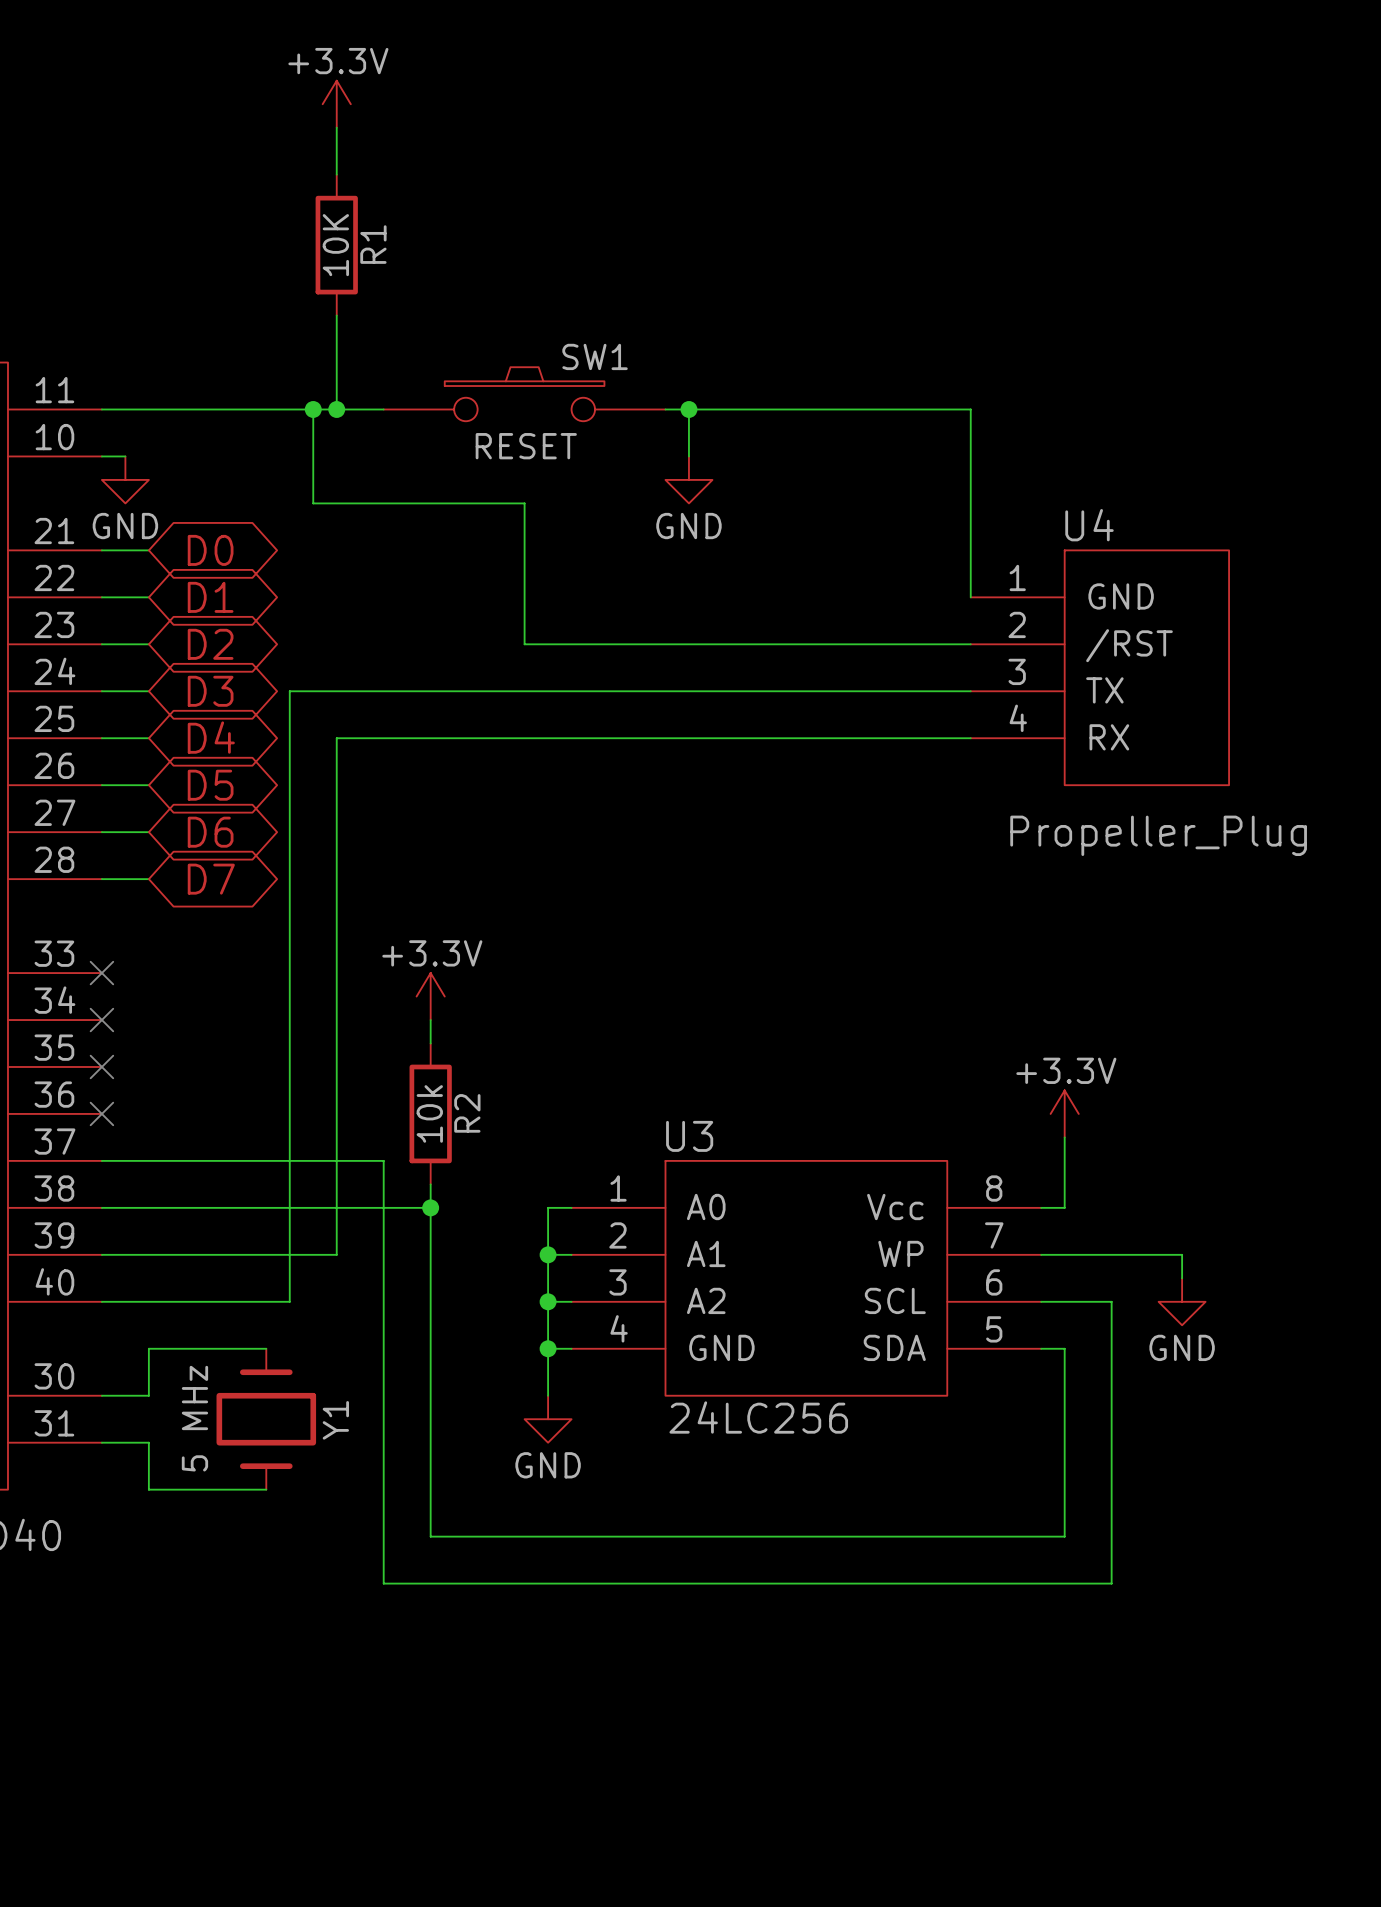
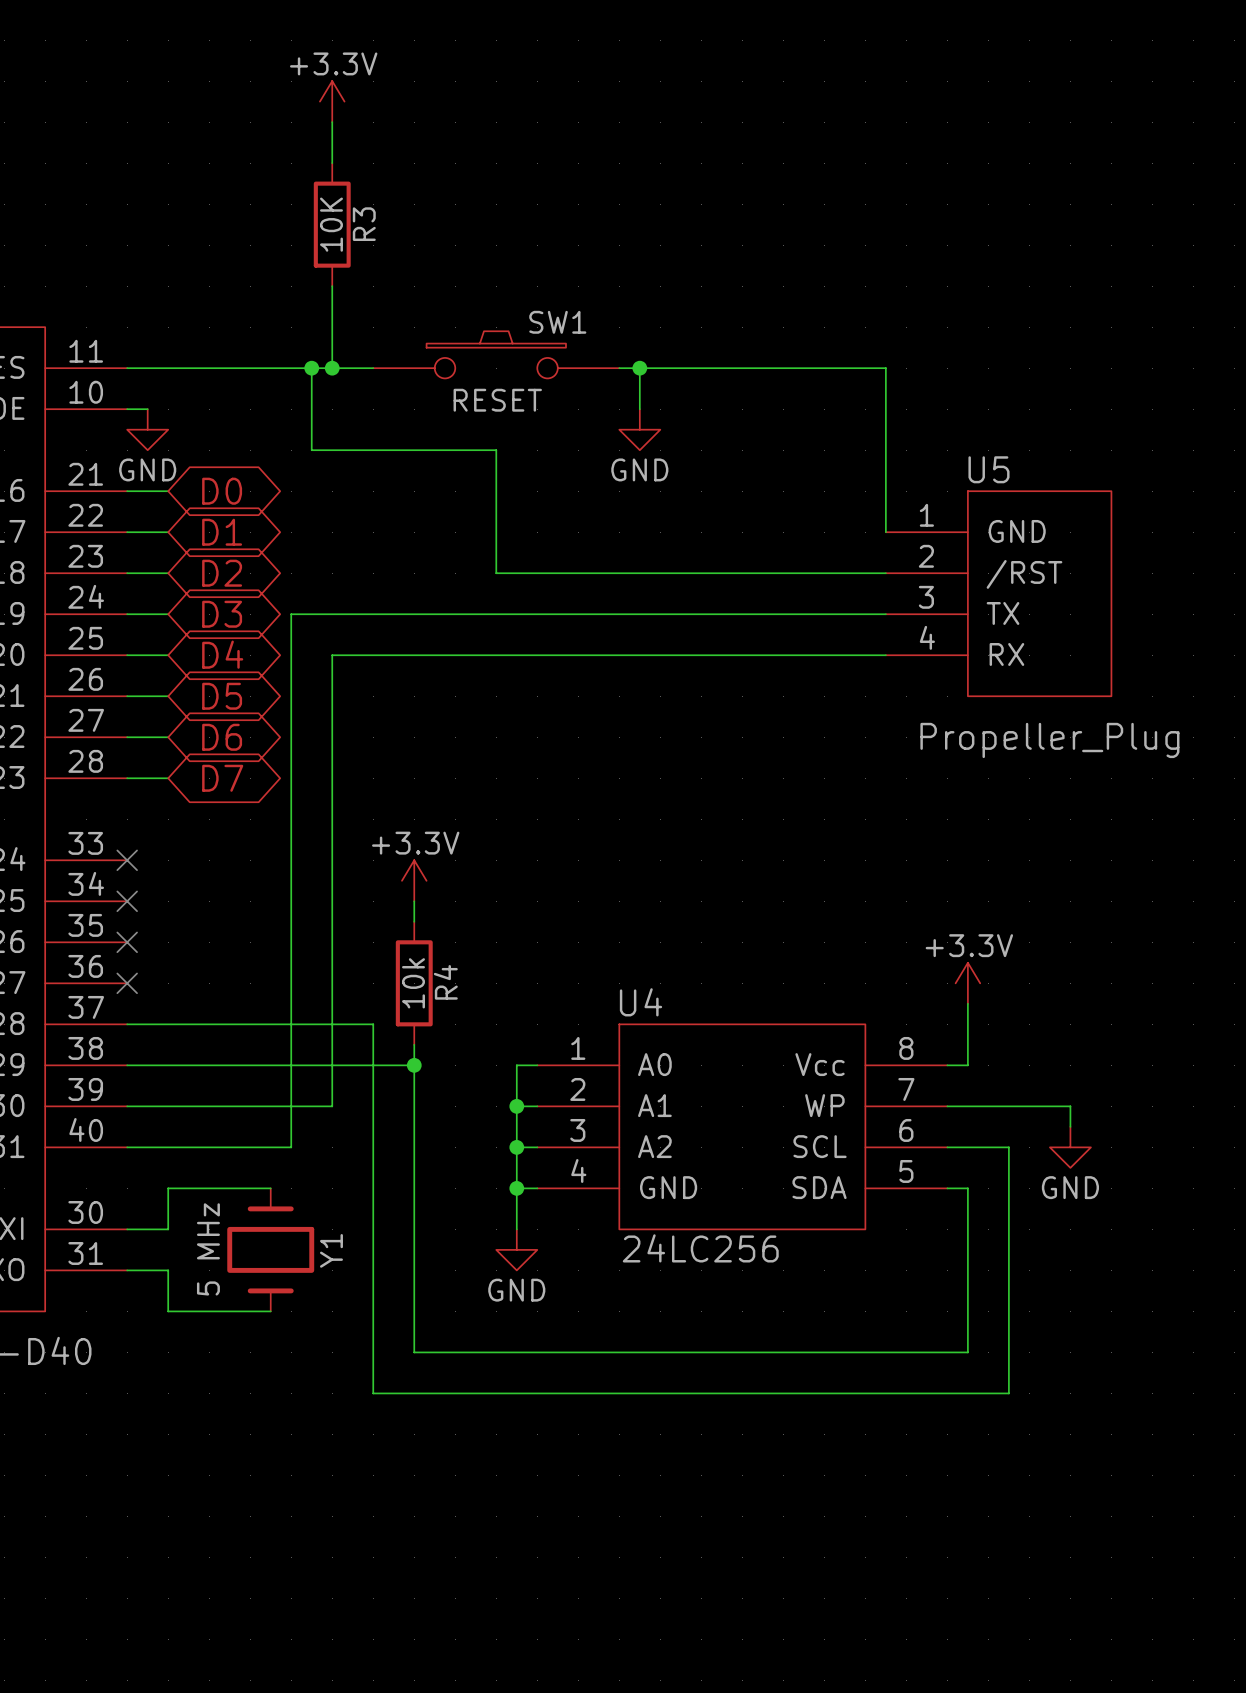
R1 name: R1 (373, 244) -> R3 (364, 224)
U4 name: U4 (1089, 525) -> U5 (988, 469)
R2 name: R2 (467, 1113) -> R4 (445, 982)
U3 name: U3 (689, 1136) -> U4 (640, 1002)

